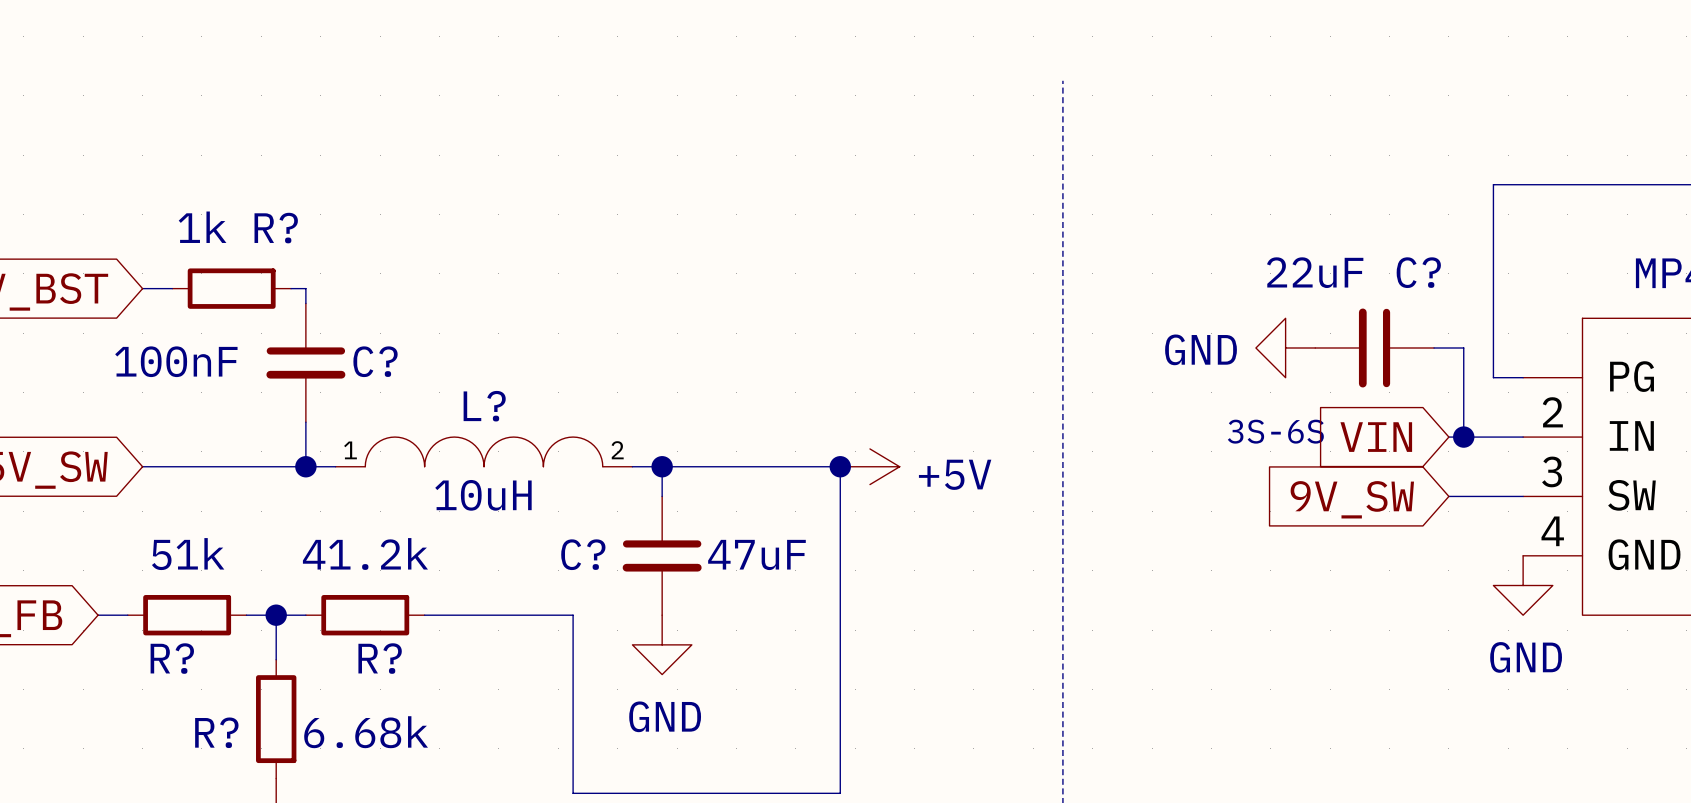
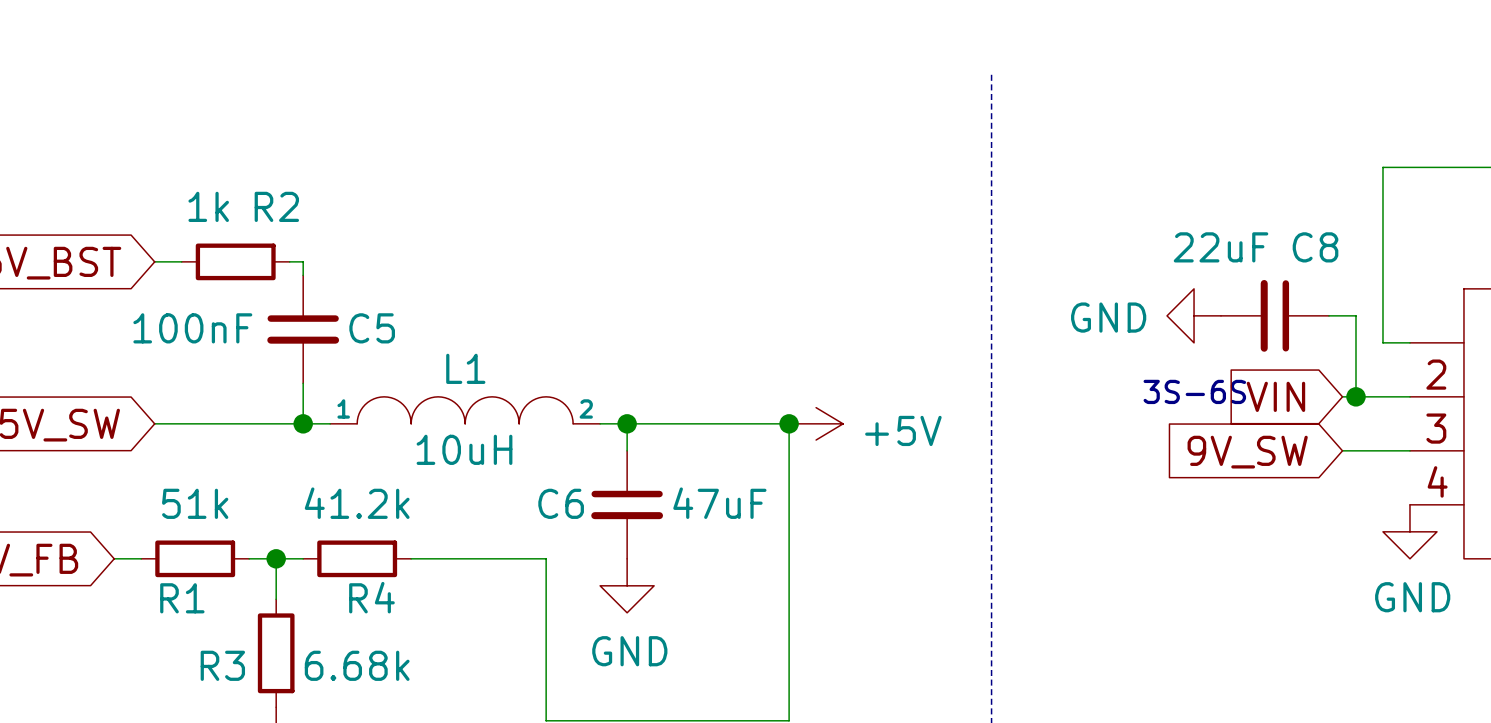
R? name: R? (276, 228) -> R2 (276, 206)
C? name: C? (1418, 272) -> C8 (1315, 247)
C? name: C? (375, 361) -> C5 (372, 328)
L? name: L? (484, 406) -> L1 (465, 368)
C? name: C? (583, 554) -> C6 (561, 503)
R? name: R? (172, 658) -> R1 (182, 598)
R? name: R? (380, 658) -> R4 (371, 597)
R? name: R? (216, 732) -> R3 (222, 665)

